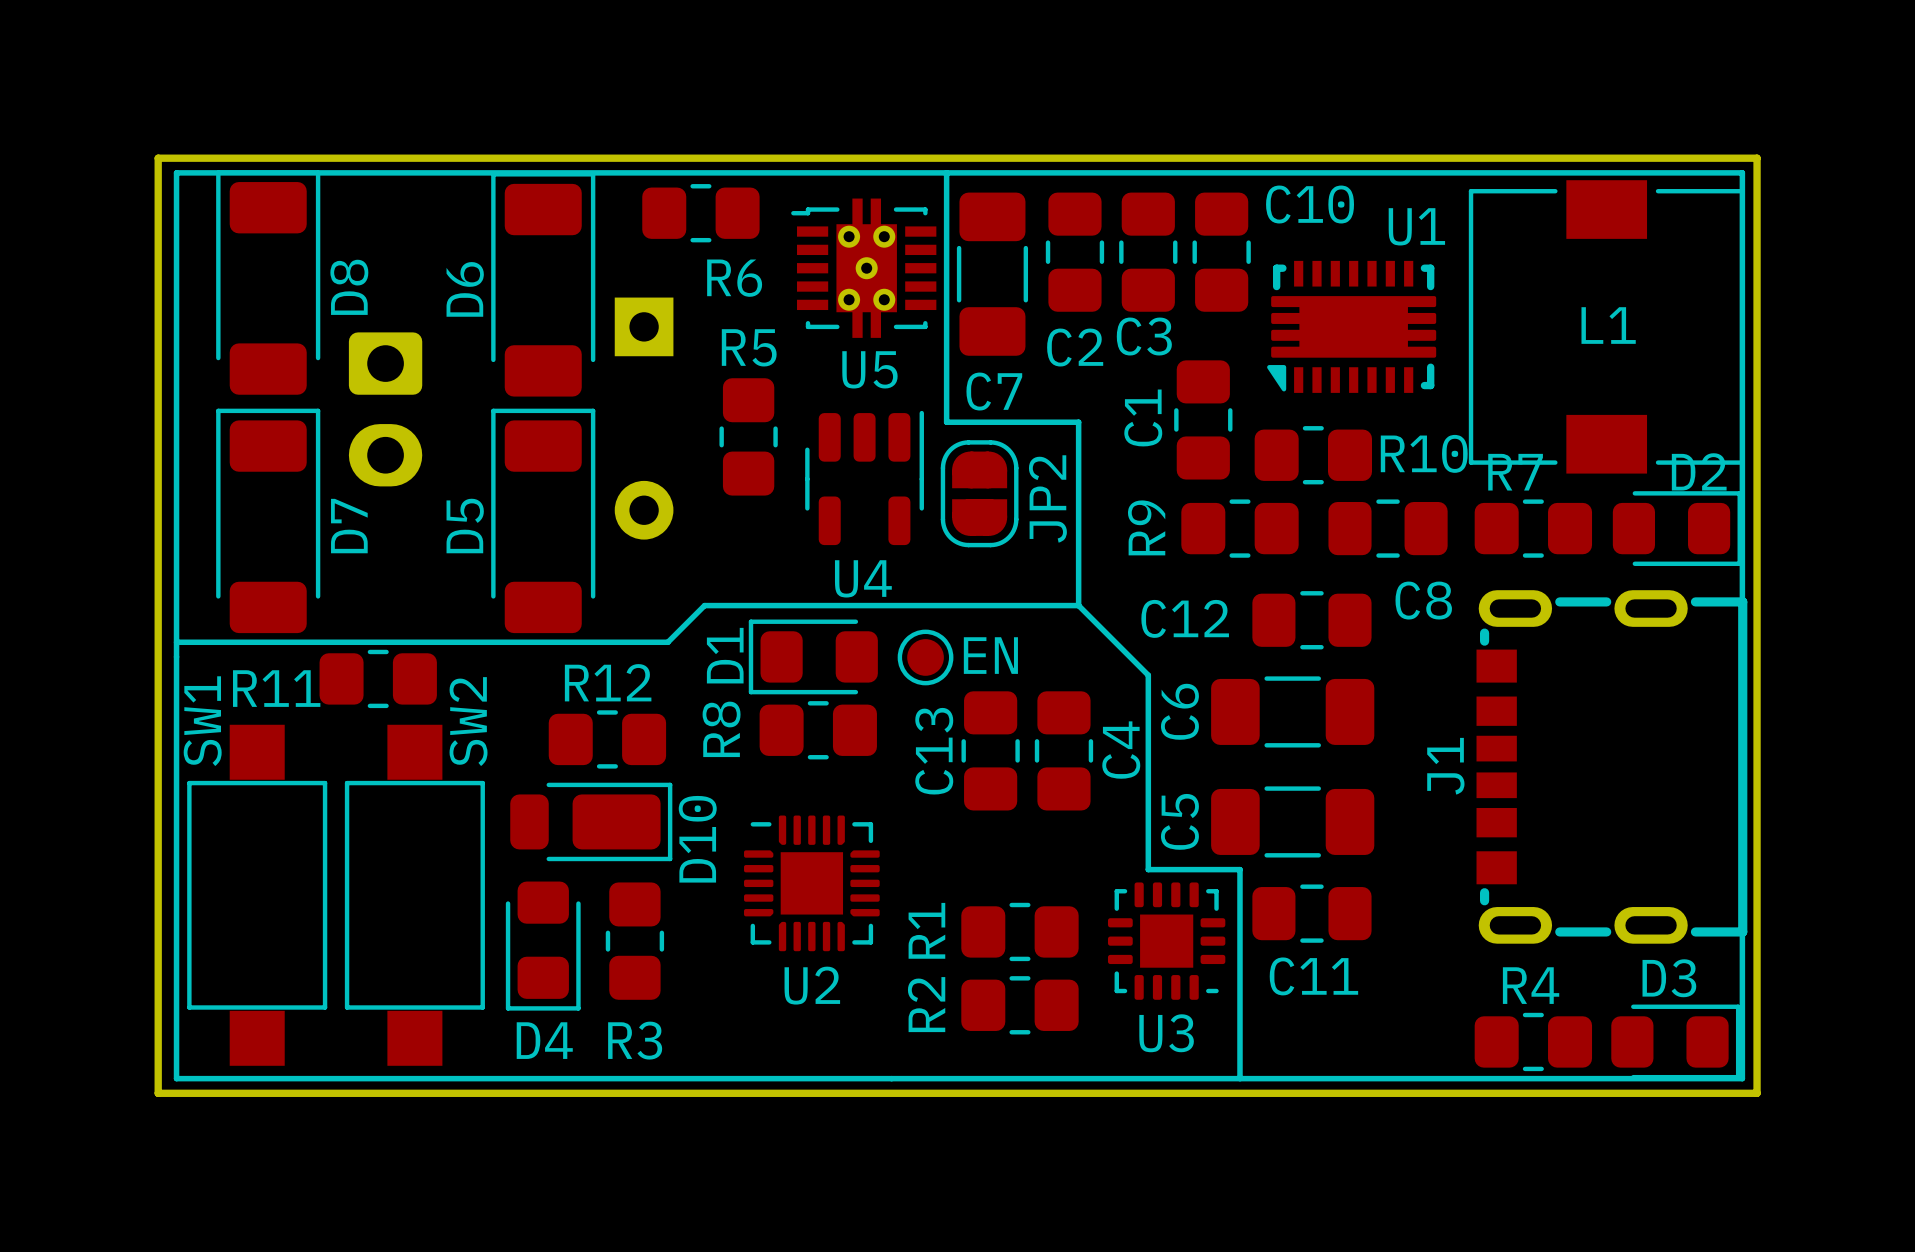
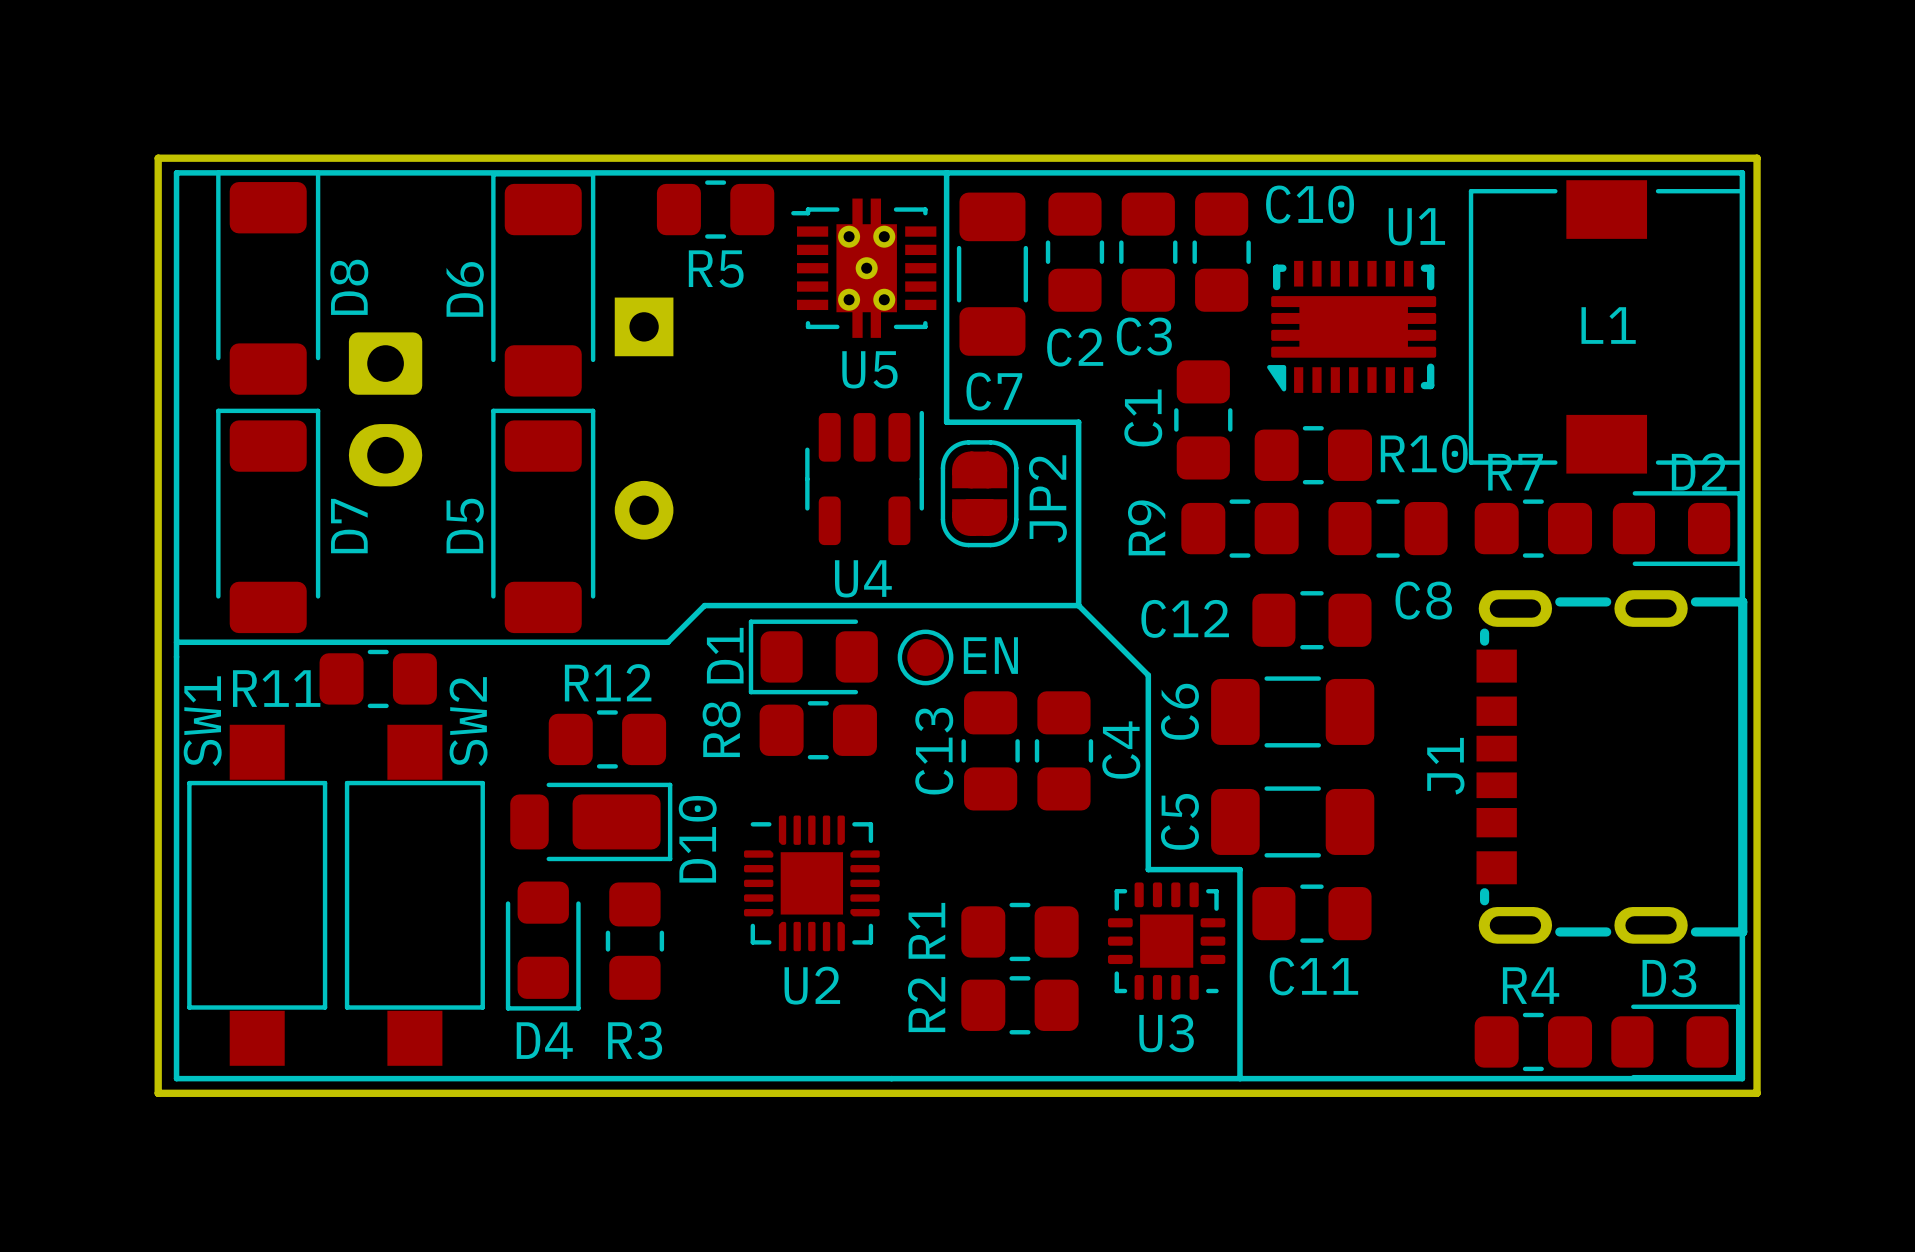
R6: (700, 213) -> none
R5 name position: R5 (749, 347) -> R5 (716, 268)
R5 rotation: 0° (748, 436) -> 90° clockwise (715, 209)
R5 position: (748, 436) -> (715, 209)

